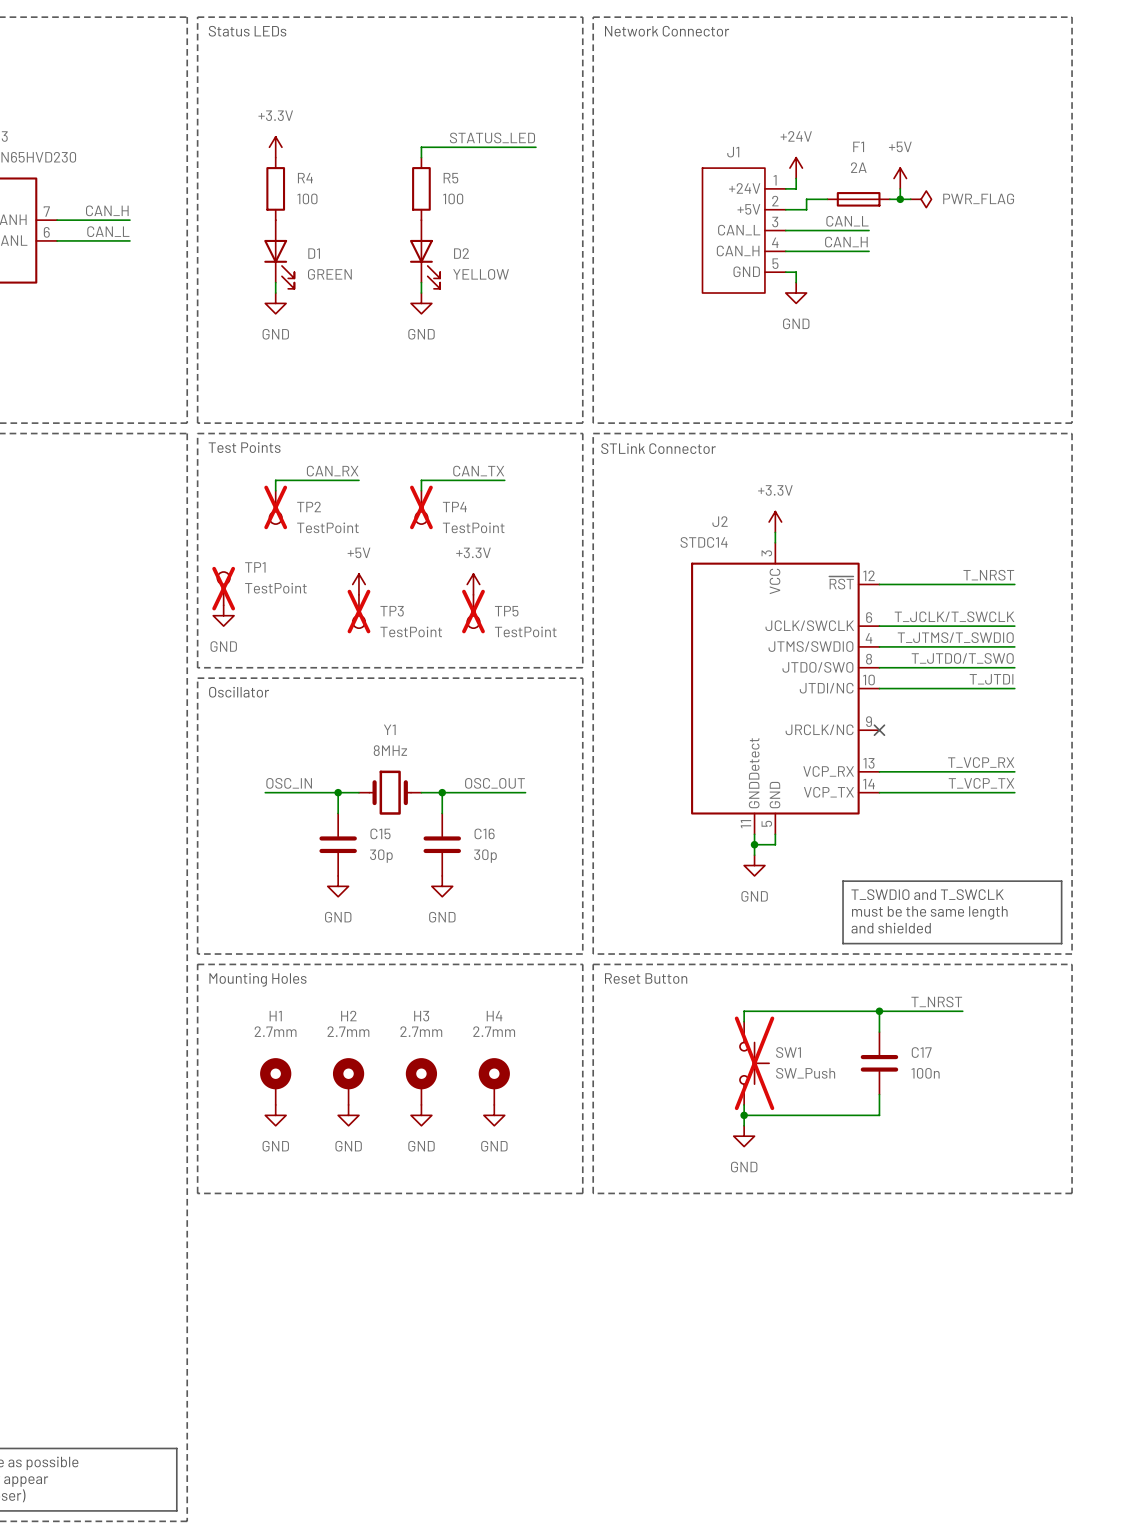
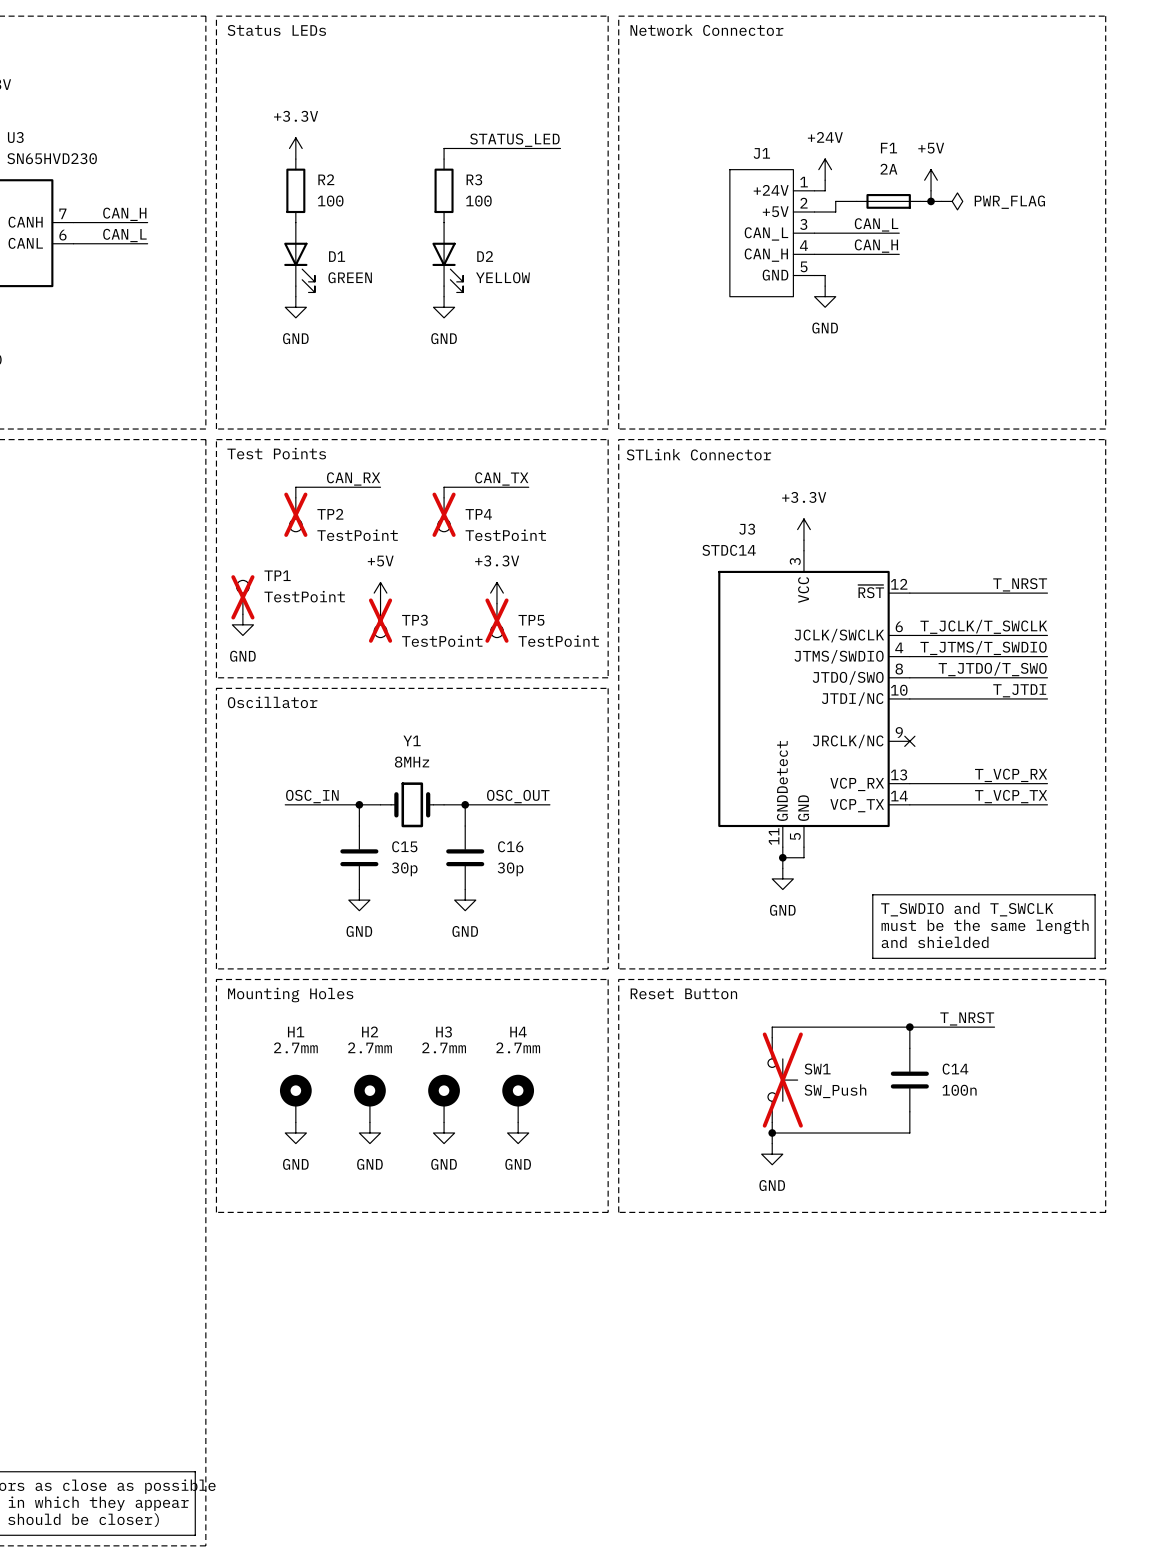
R4 name: R4 (305, 178) -> R2 (326, 179)
R5 name: R5 (450, 178) -> R3 (474, 179)
J2 name: J2 (720, 521) -> J3 (747, 529)
C17 name: C17 (921, 1052) -> C14 (955, 1069)

